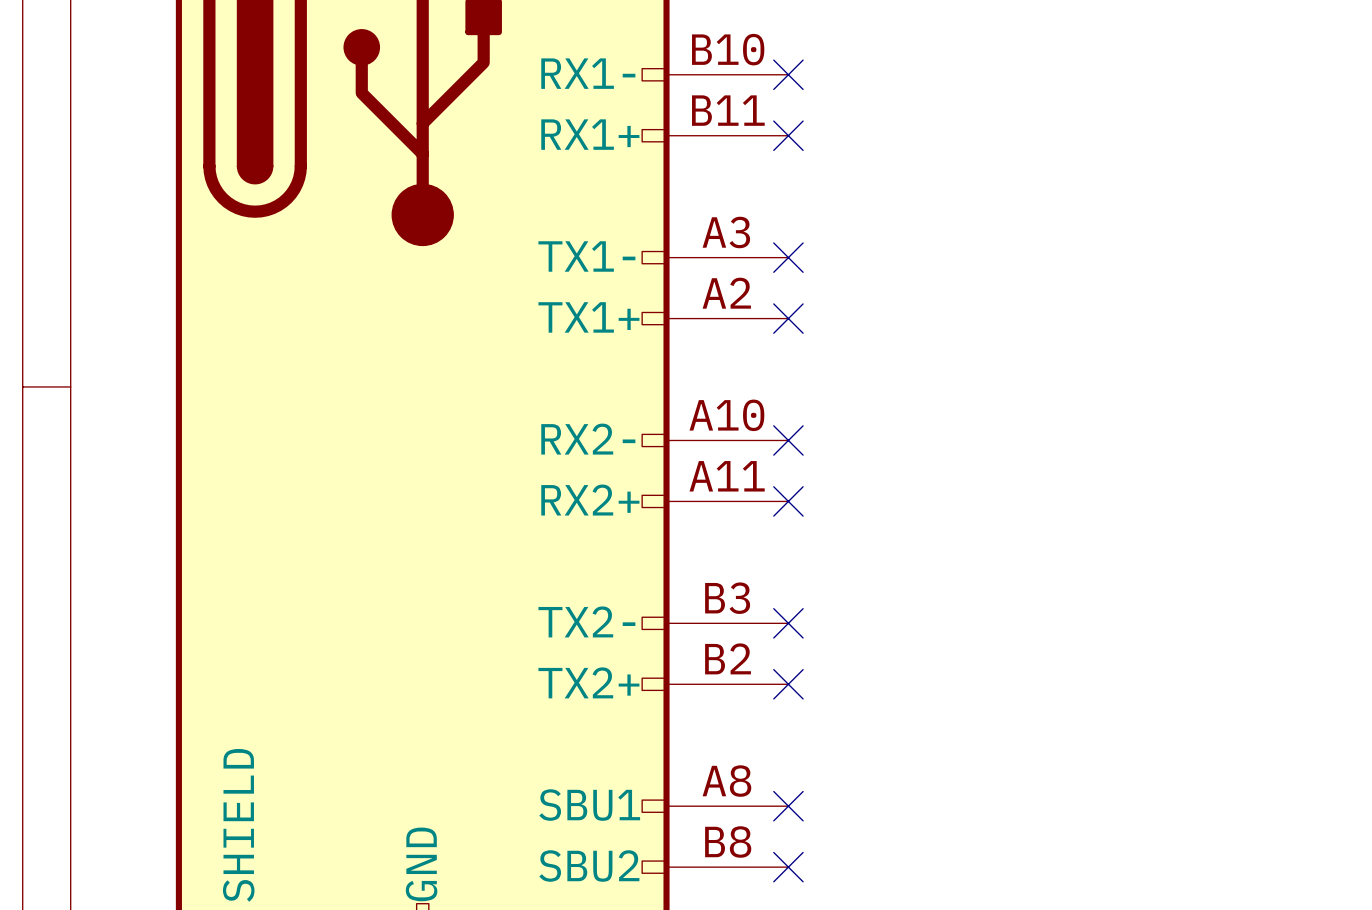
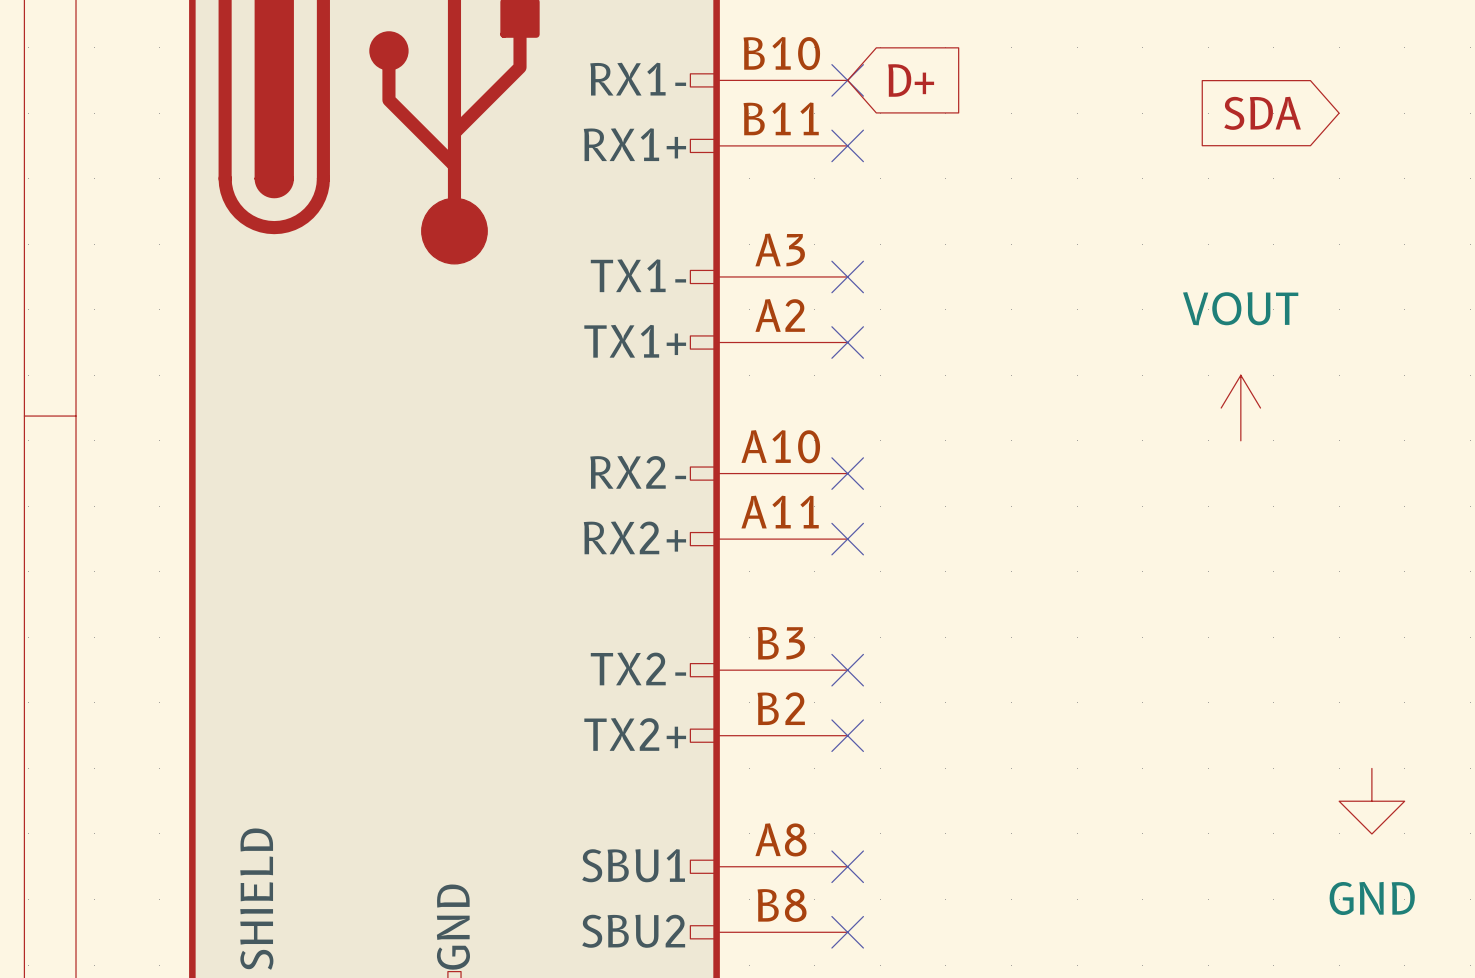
global label: none -> D+ (911, 80)
global label: none -> SDA (1262, 113)
power symbol: none -> VOUT (1240, 408)
power symbol: none -> GND (1371, 801)

